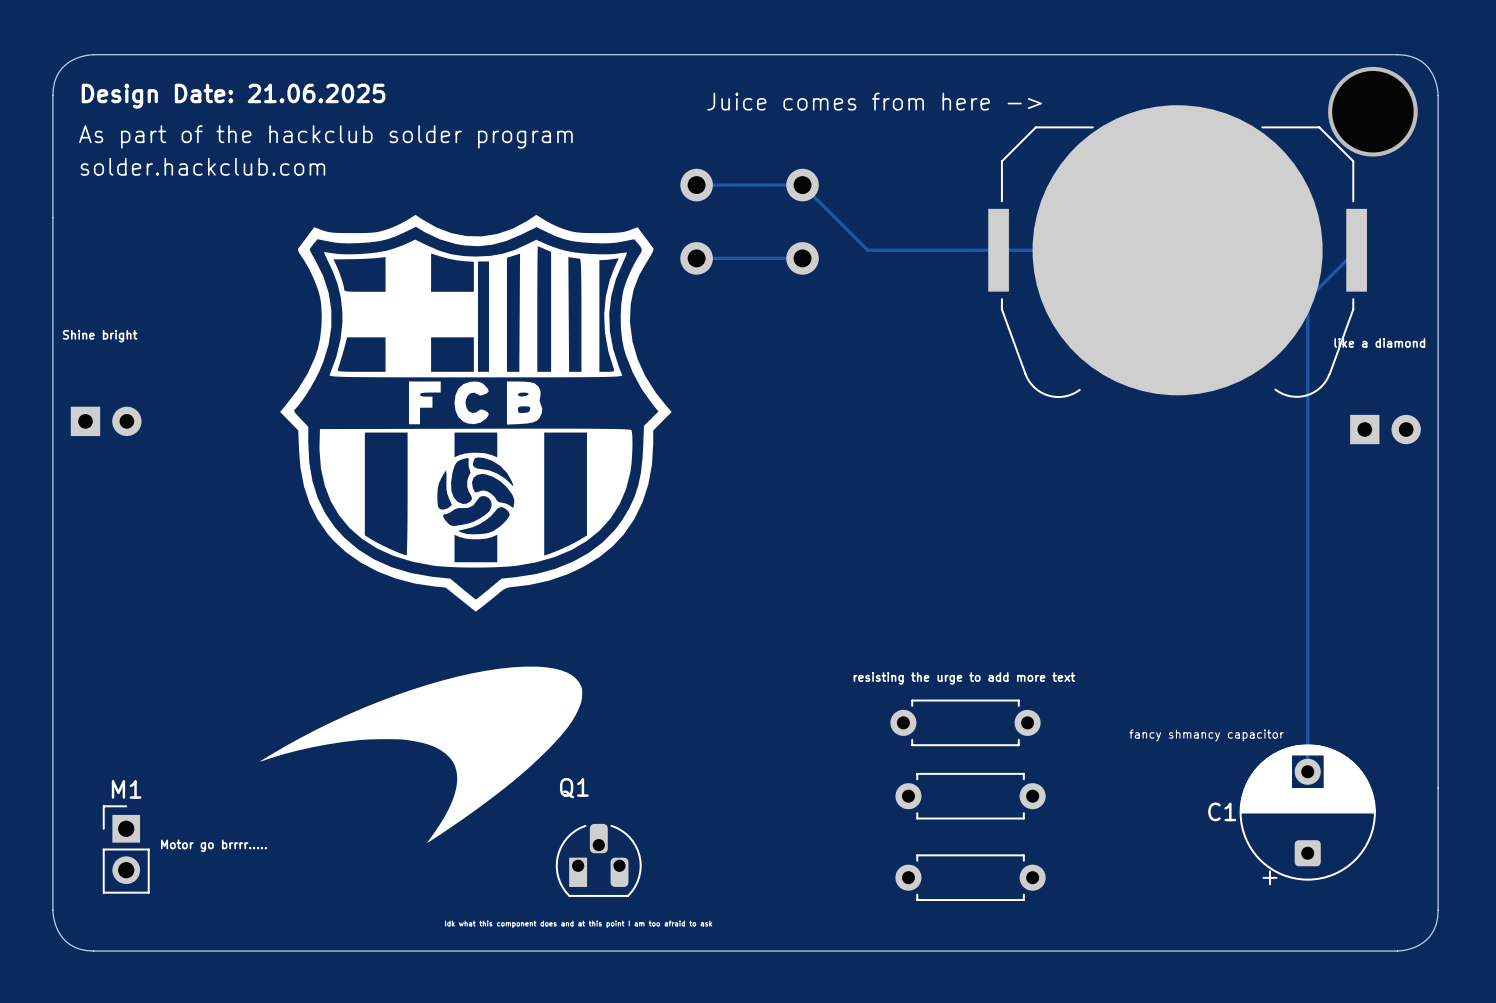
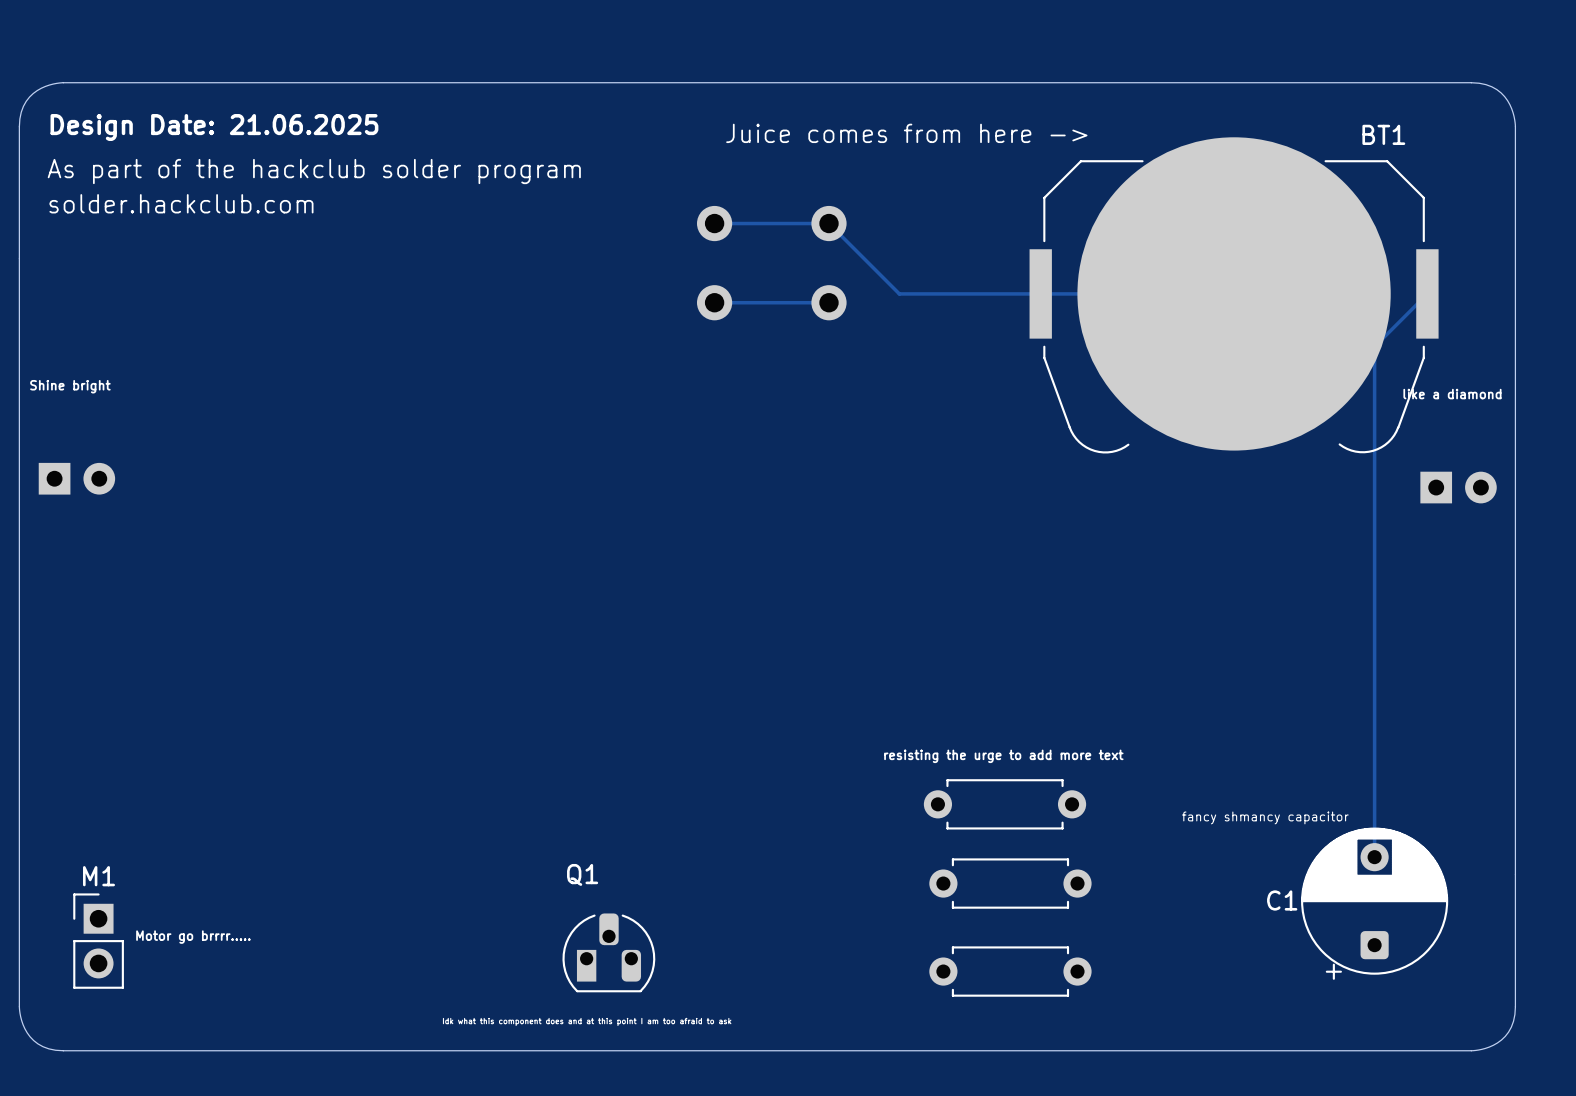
BT1 name: none -> BT1 (1383, 134)
via: (1372, 111) -> none
drawing: [280, 214, 672, 612] -> none
drawing: [259, 666, 583, 843] -> none

